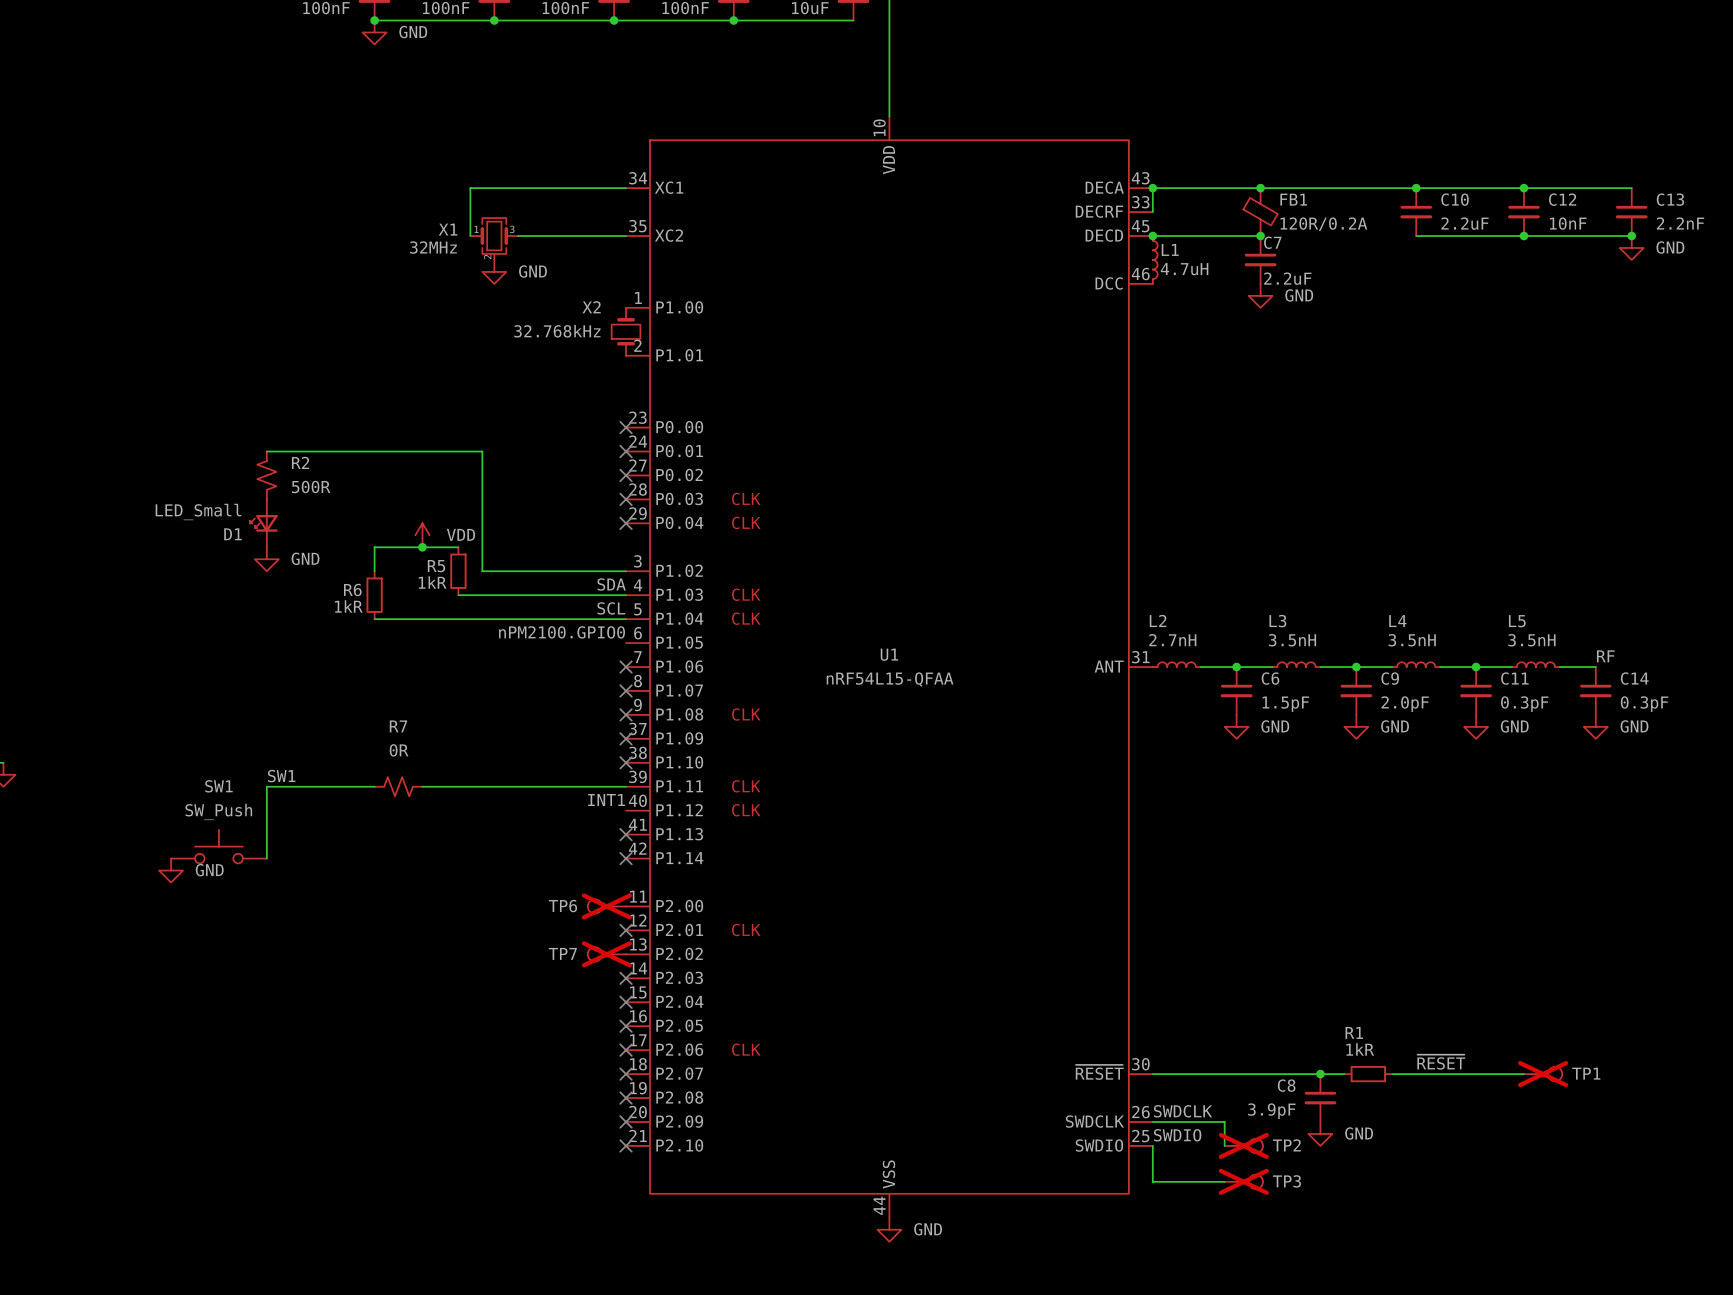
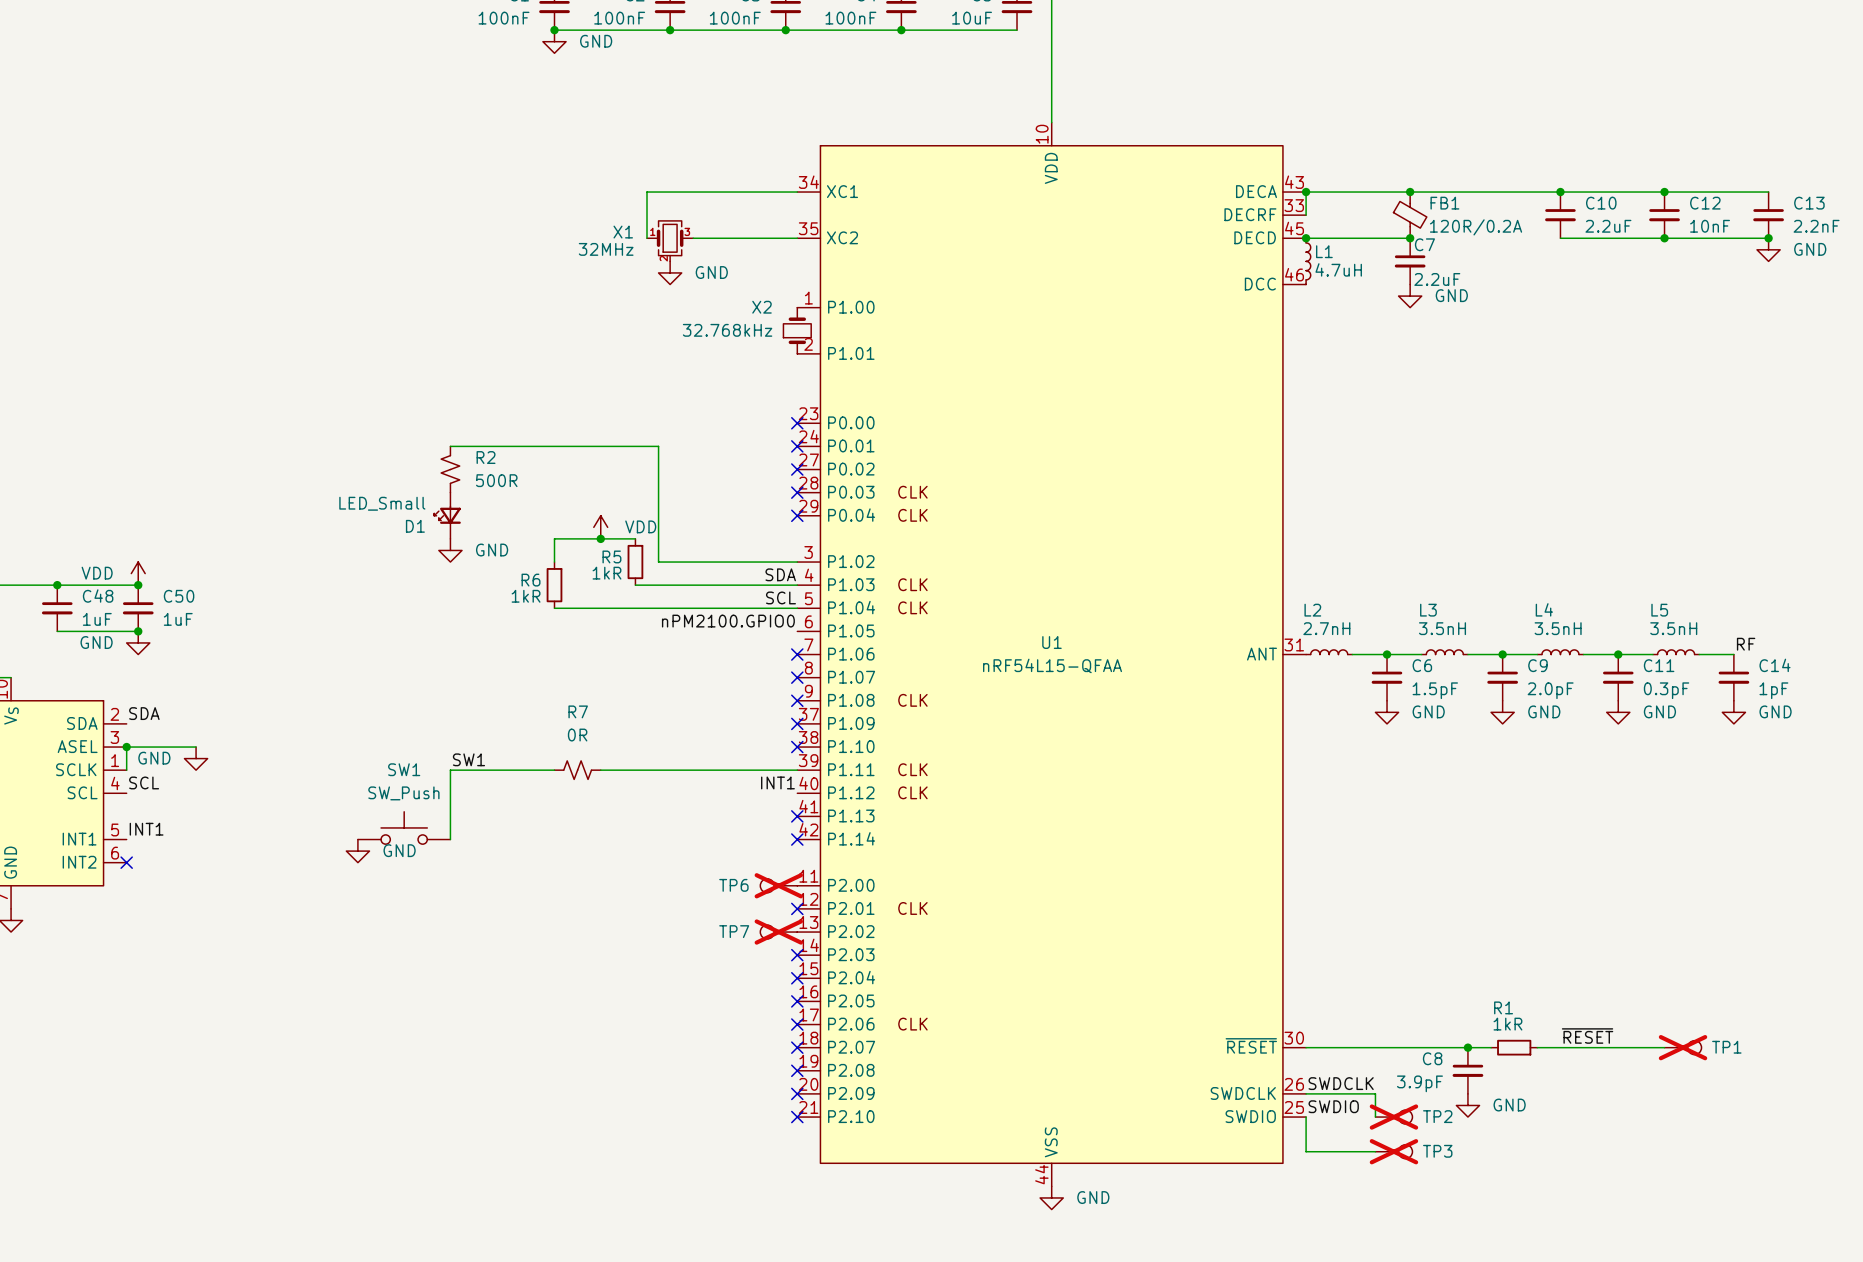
C14 value: 0.3pF (1644, 704) -> 1pF (1773, 690)

